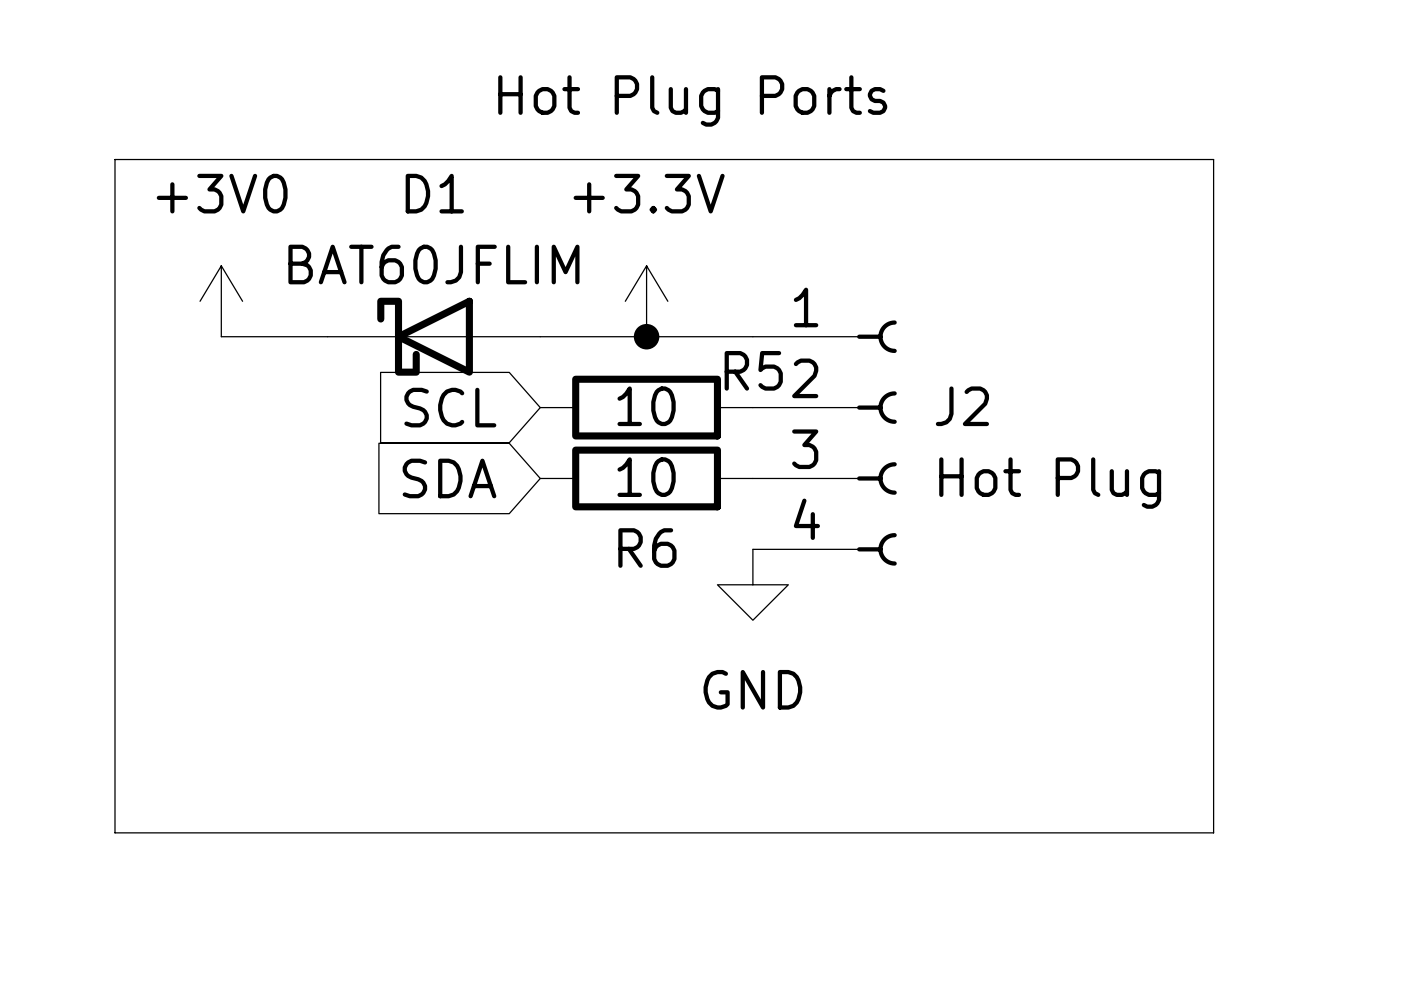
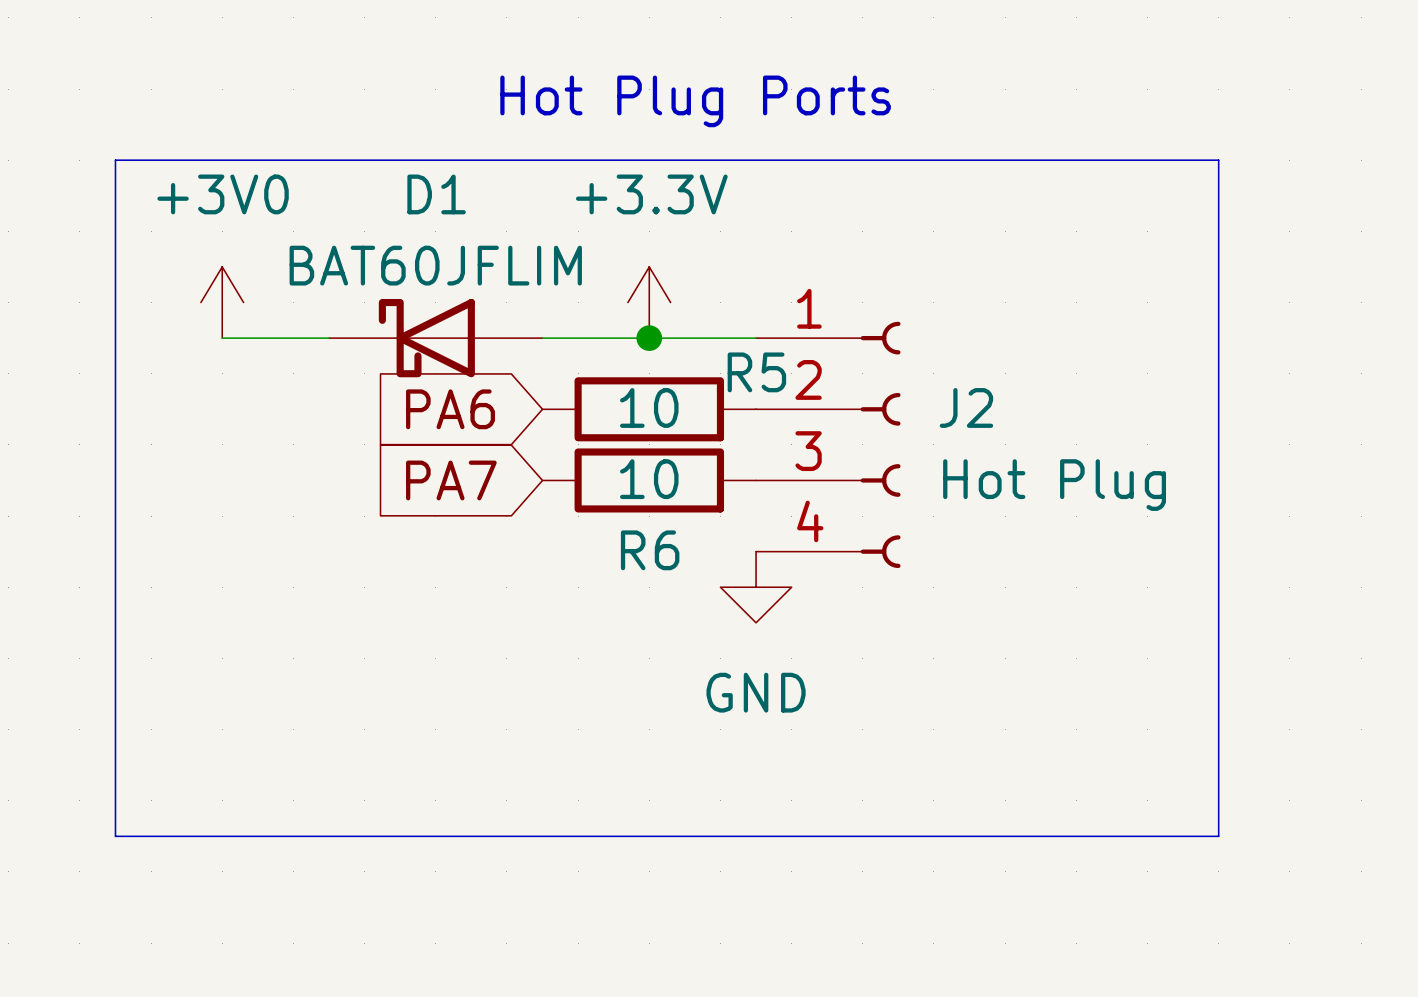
global label: SCL (450, 407) -> PA6 (450, 409)
global label: SDA (449, 478) -> PA7 (451, 480)

